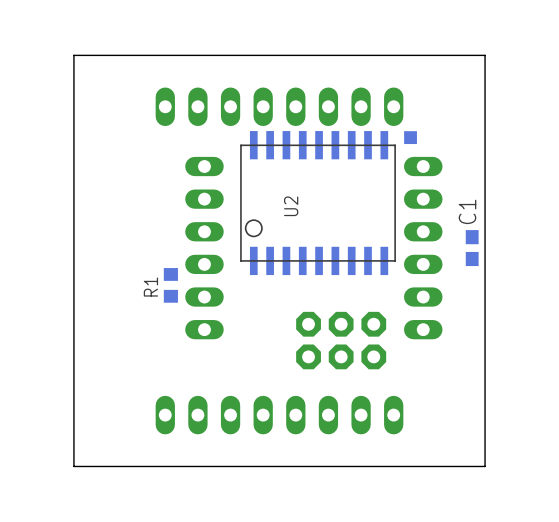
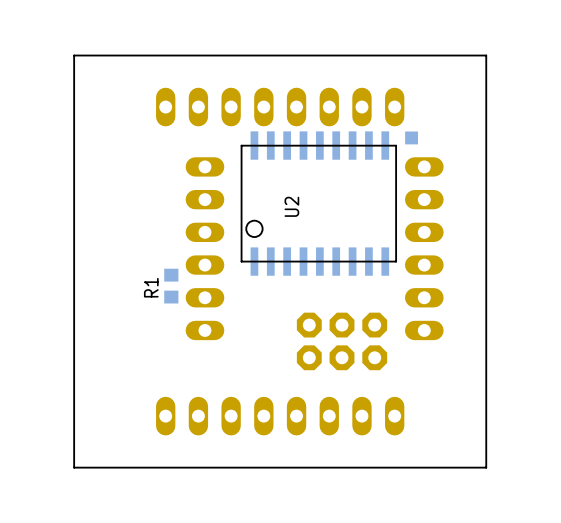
C1: (472, 248) -> none

